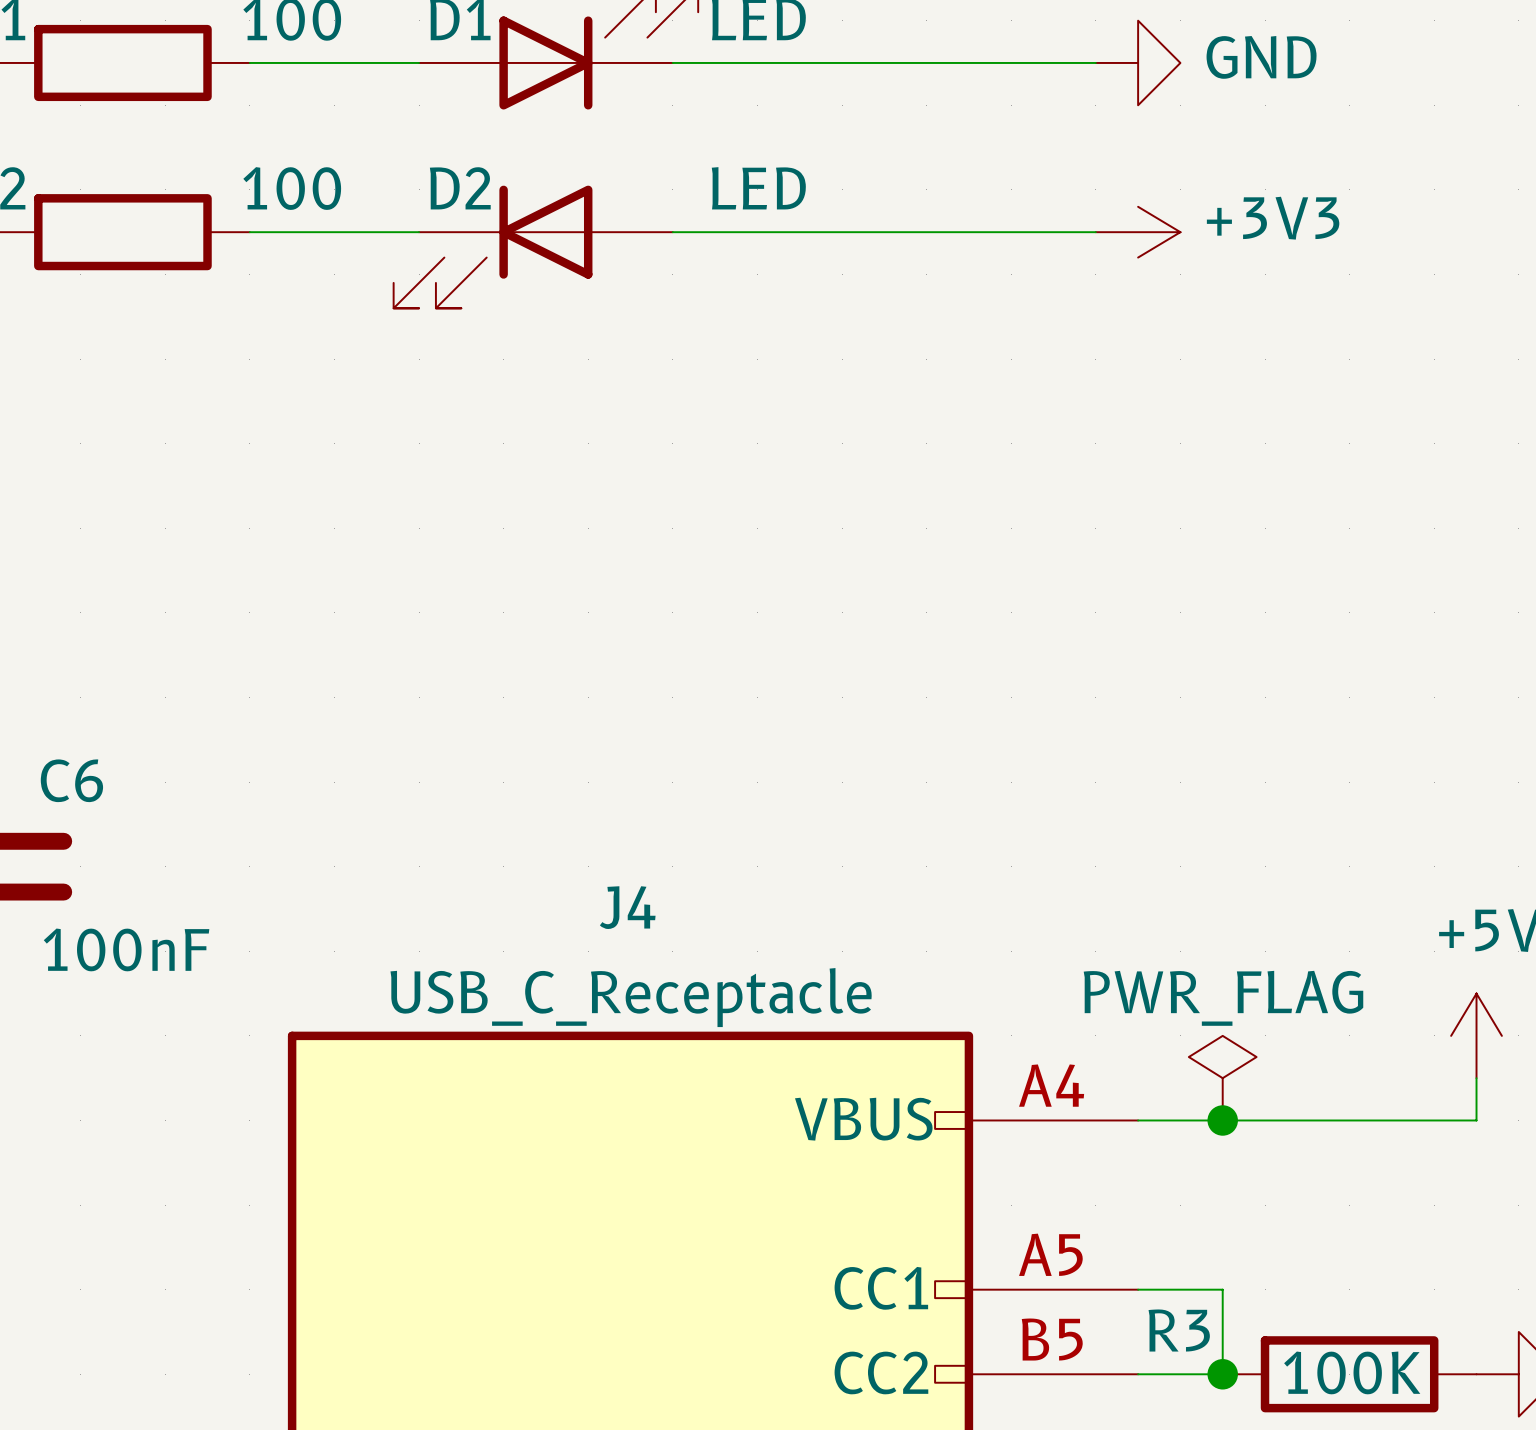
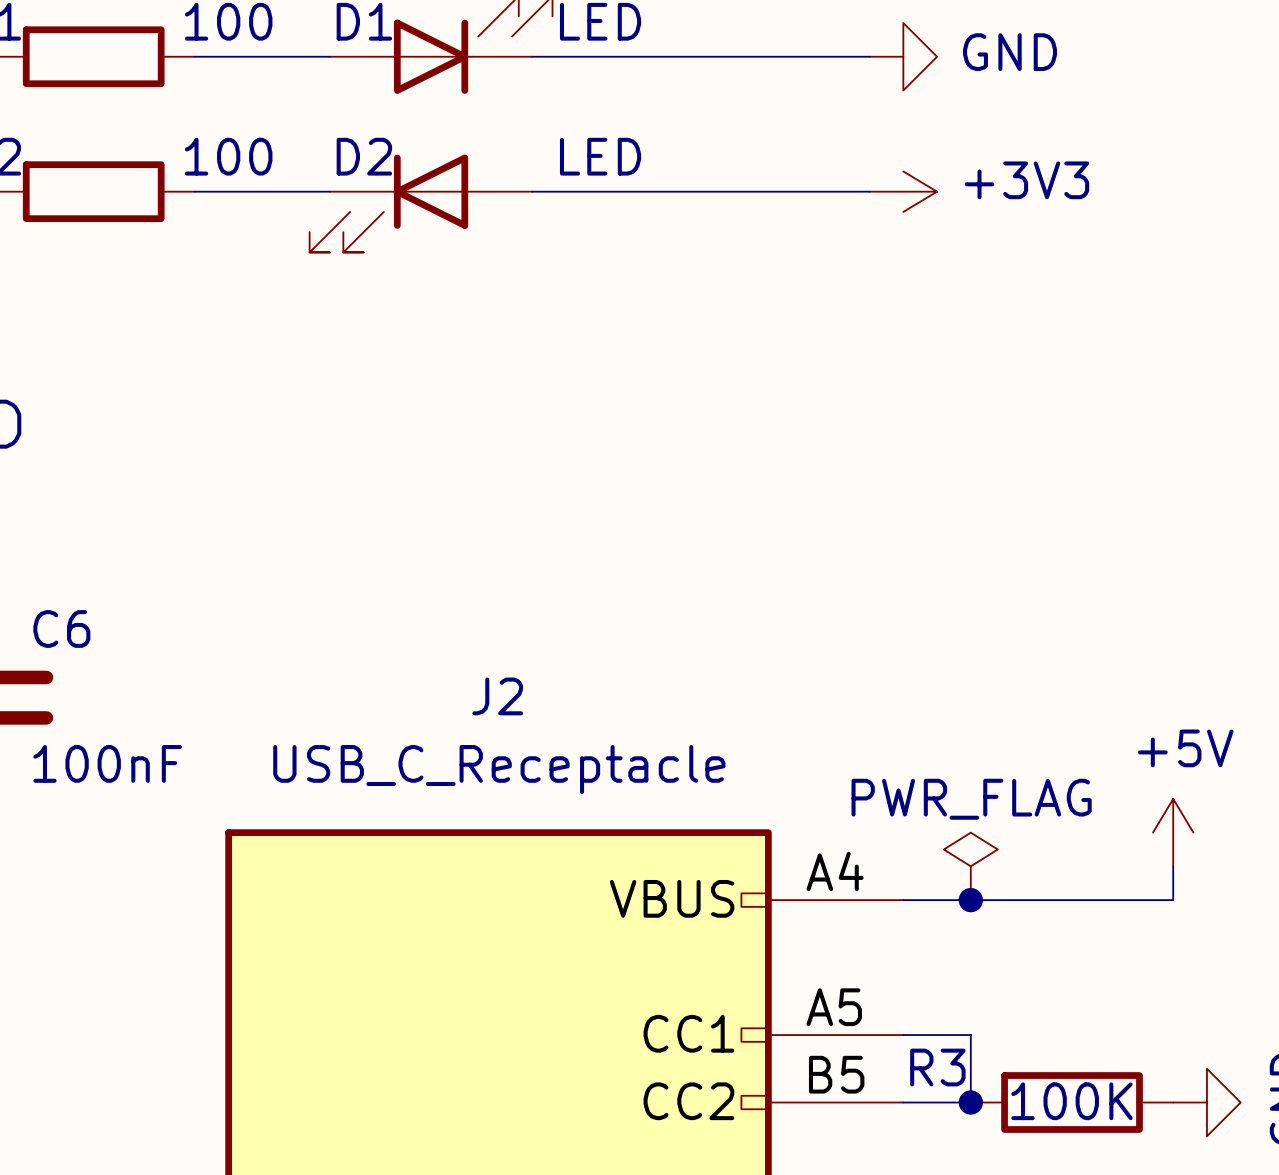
J4 name: J4 (627, 907) -> J2 (497, 696)
J4 value position: USB_C_Receptacle (631, 997) -> USB_C_Receptacle (499, 769)

